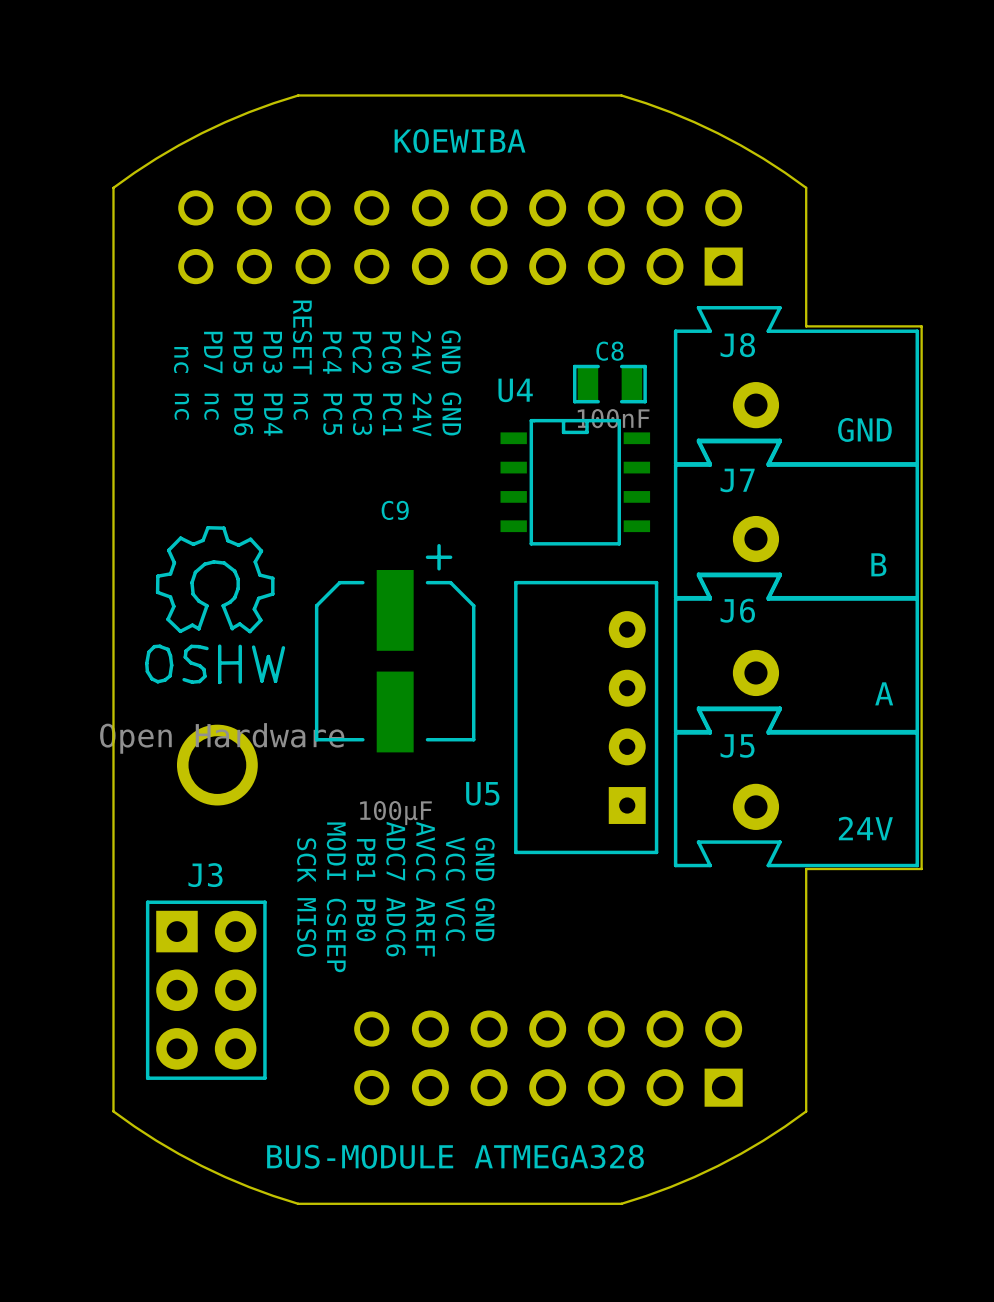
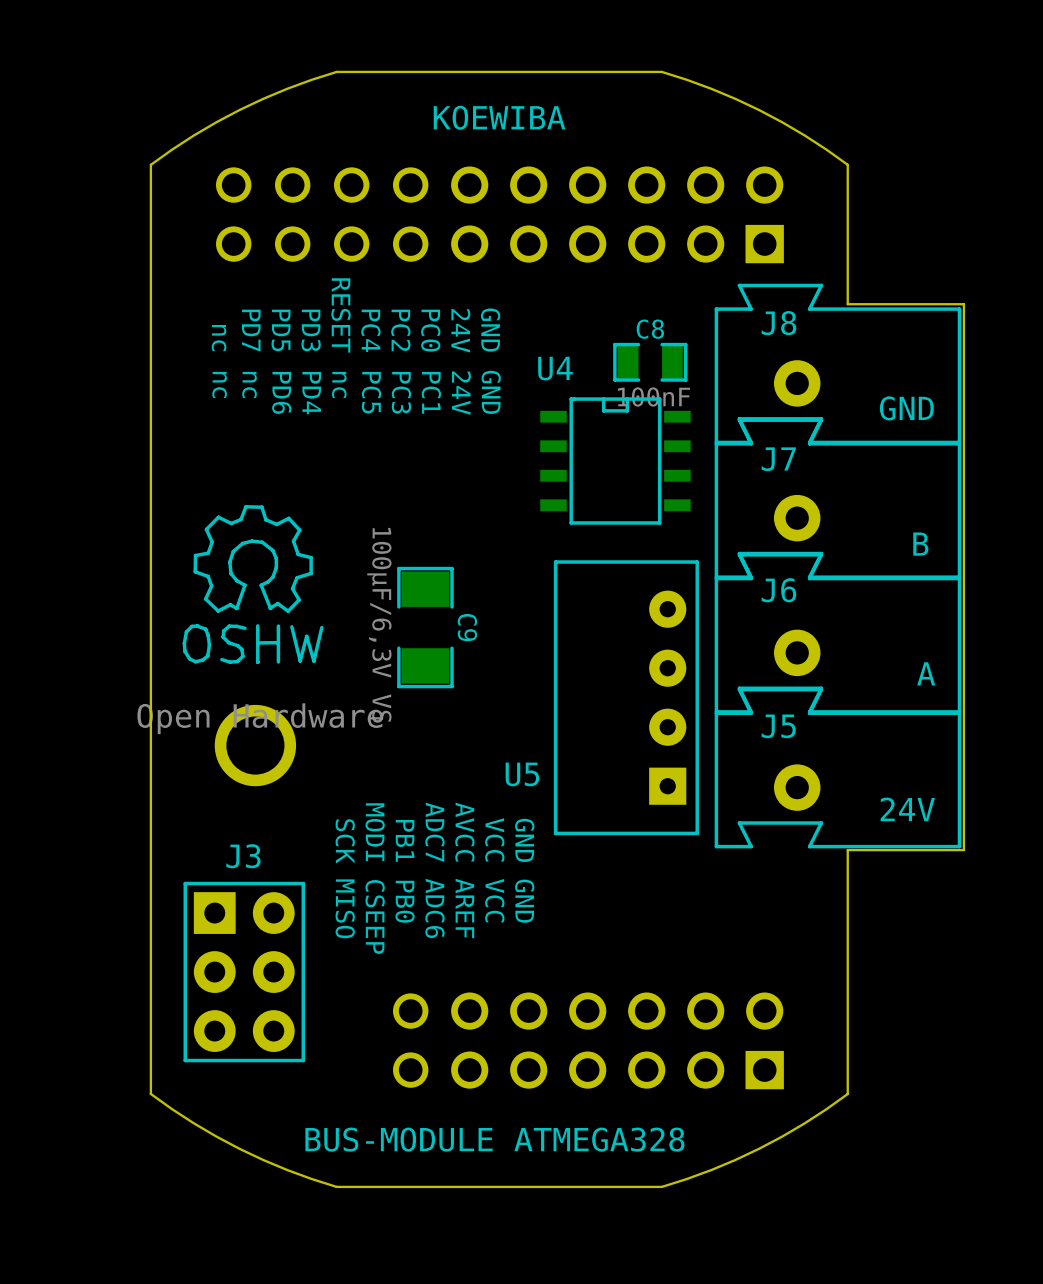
C9 name position: C9 (395, 510) -> C9 (467, 627)
C9 footprint: [314, 543, 476, 753] -> [397, 566, 454, 689]
C9 value: 100µF (395, 813) -> 100µF/6,3V VS (379, 625)

